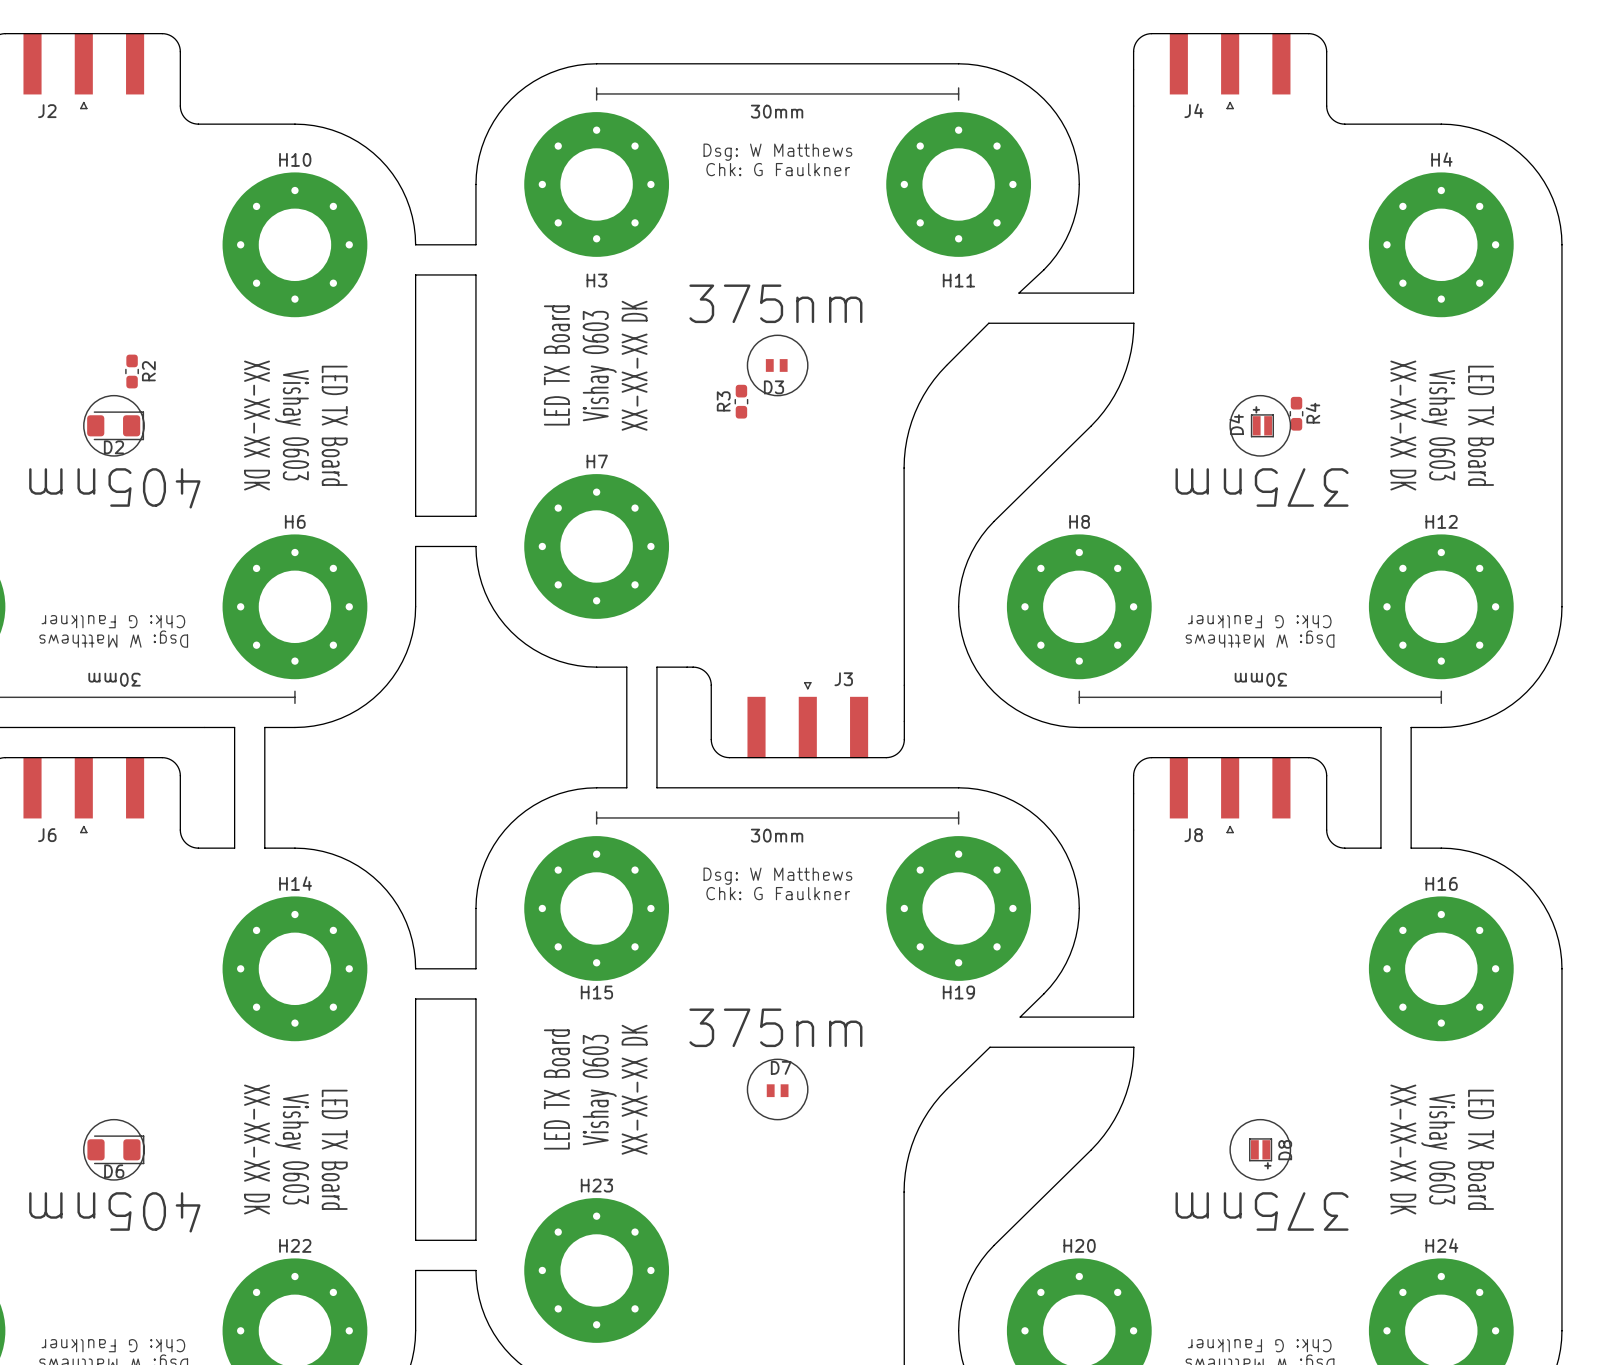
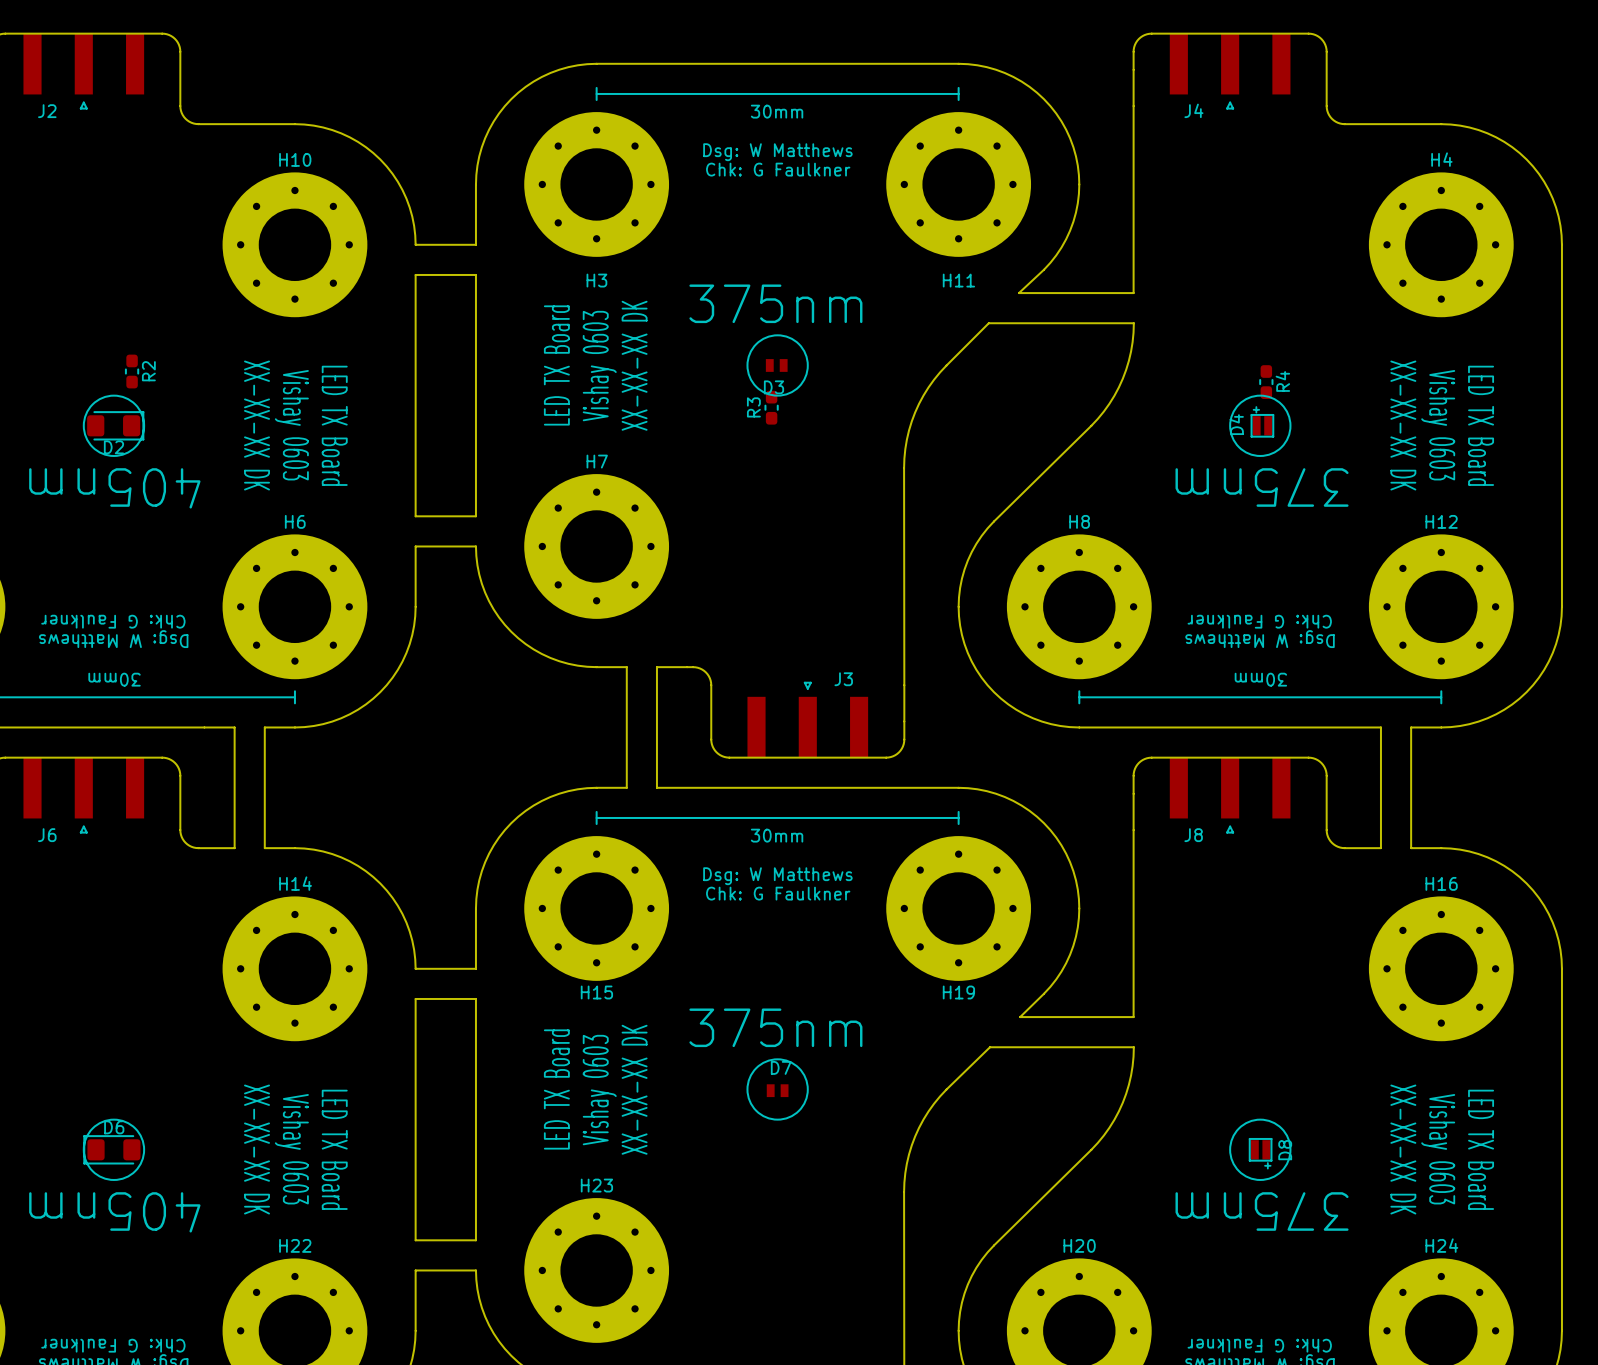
R3 position: (741, 401) -> (771, 407)
R4 position: (1296, 413) -> (1266, 382)
D6 rotation: 0° (115, 1149) -> 180° (112, 1149)

